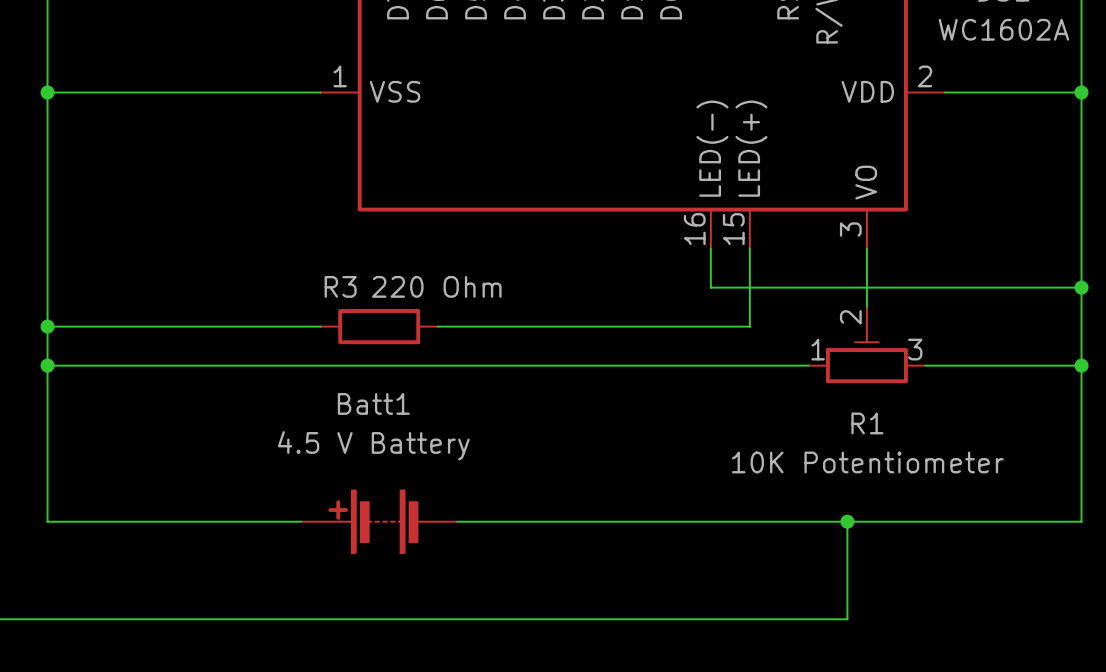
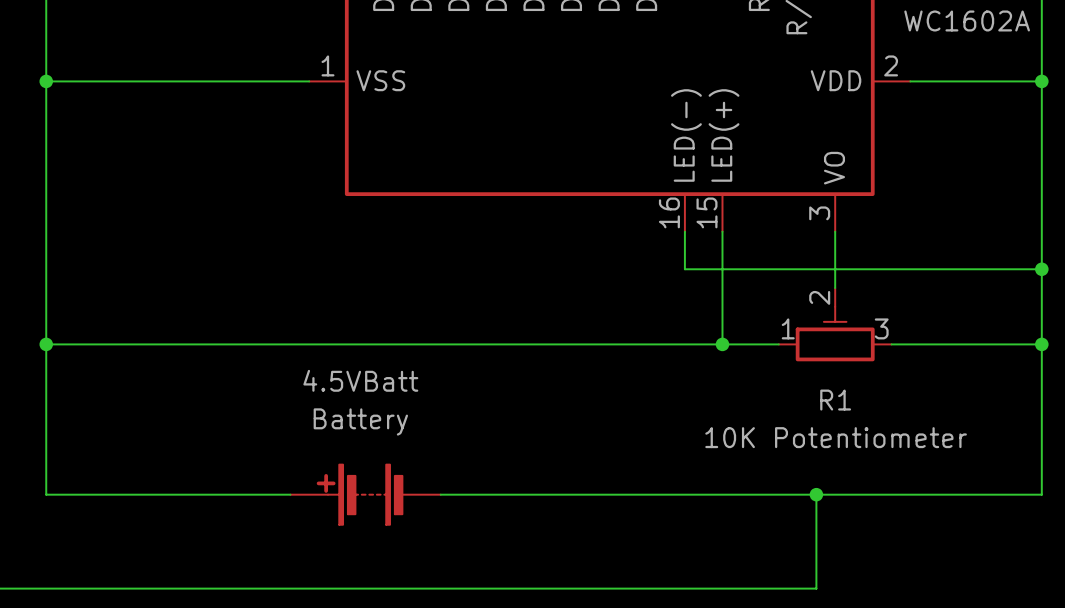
wire: (47, 326) (320, 326) -> none
junction: (47, 326) -> none
R3: 220 Ohm (379, 326) -> none
wire: (437, 326) (749, 326) -> (722, 344) (722, 306)
junction: none -> (722, 344)
Batt1 name: Batt1 (373, 403) -> 4.5VBatt (360, 380)
Batt1 value: 4.5 V Battery (373, 445) -> Battery (360, 421)

